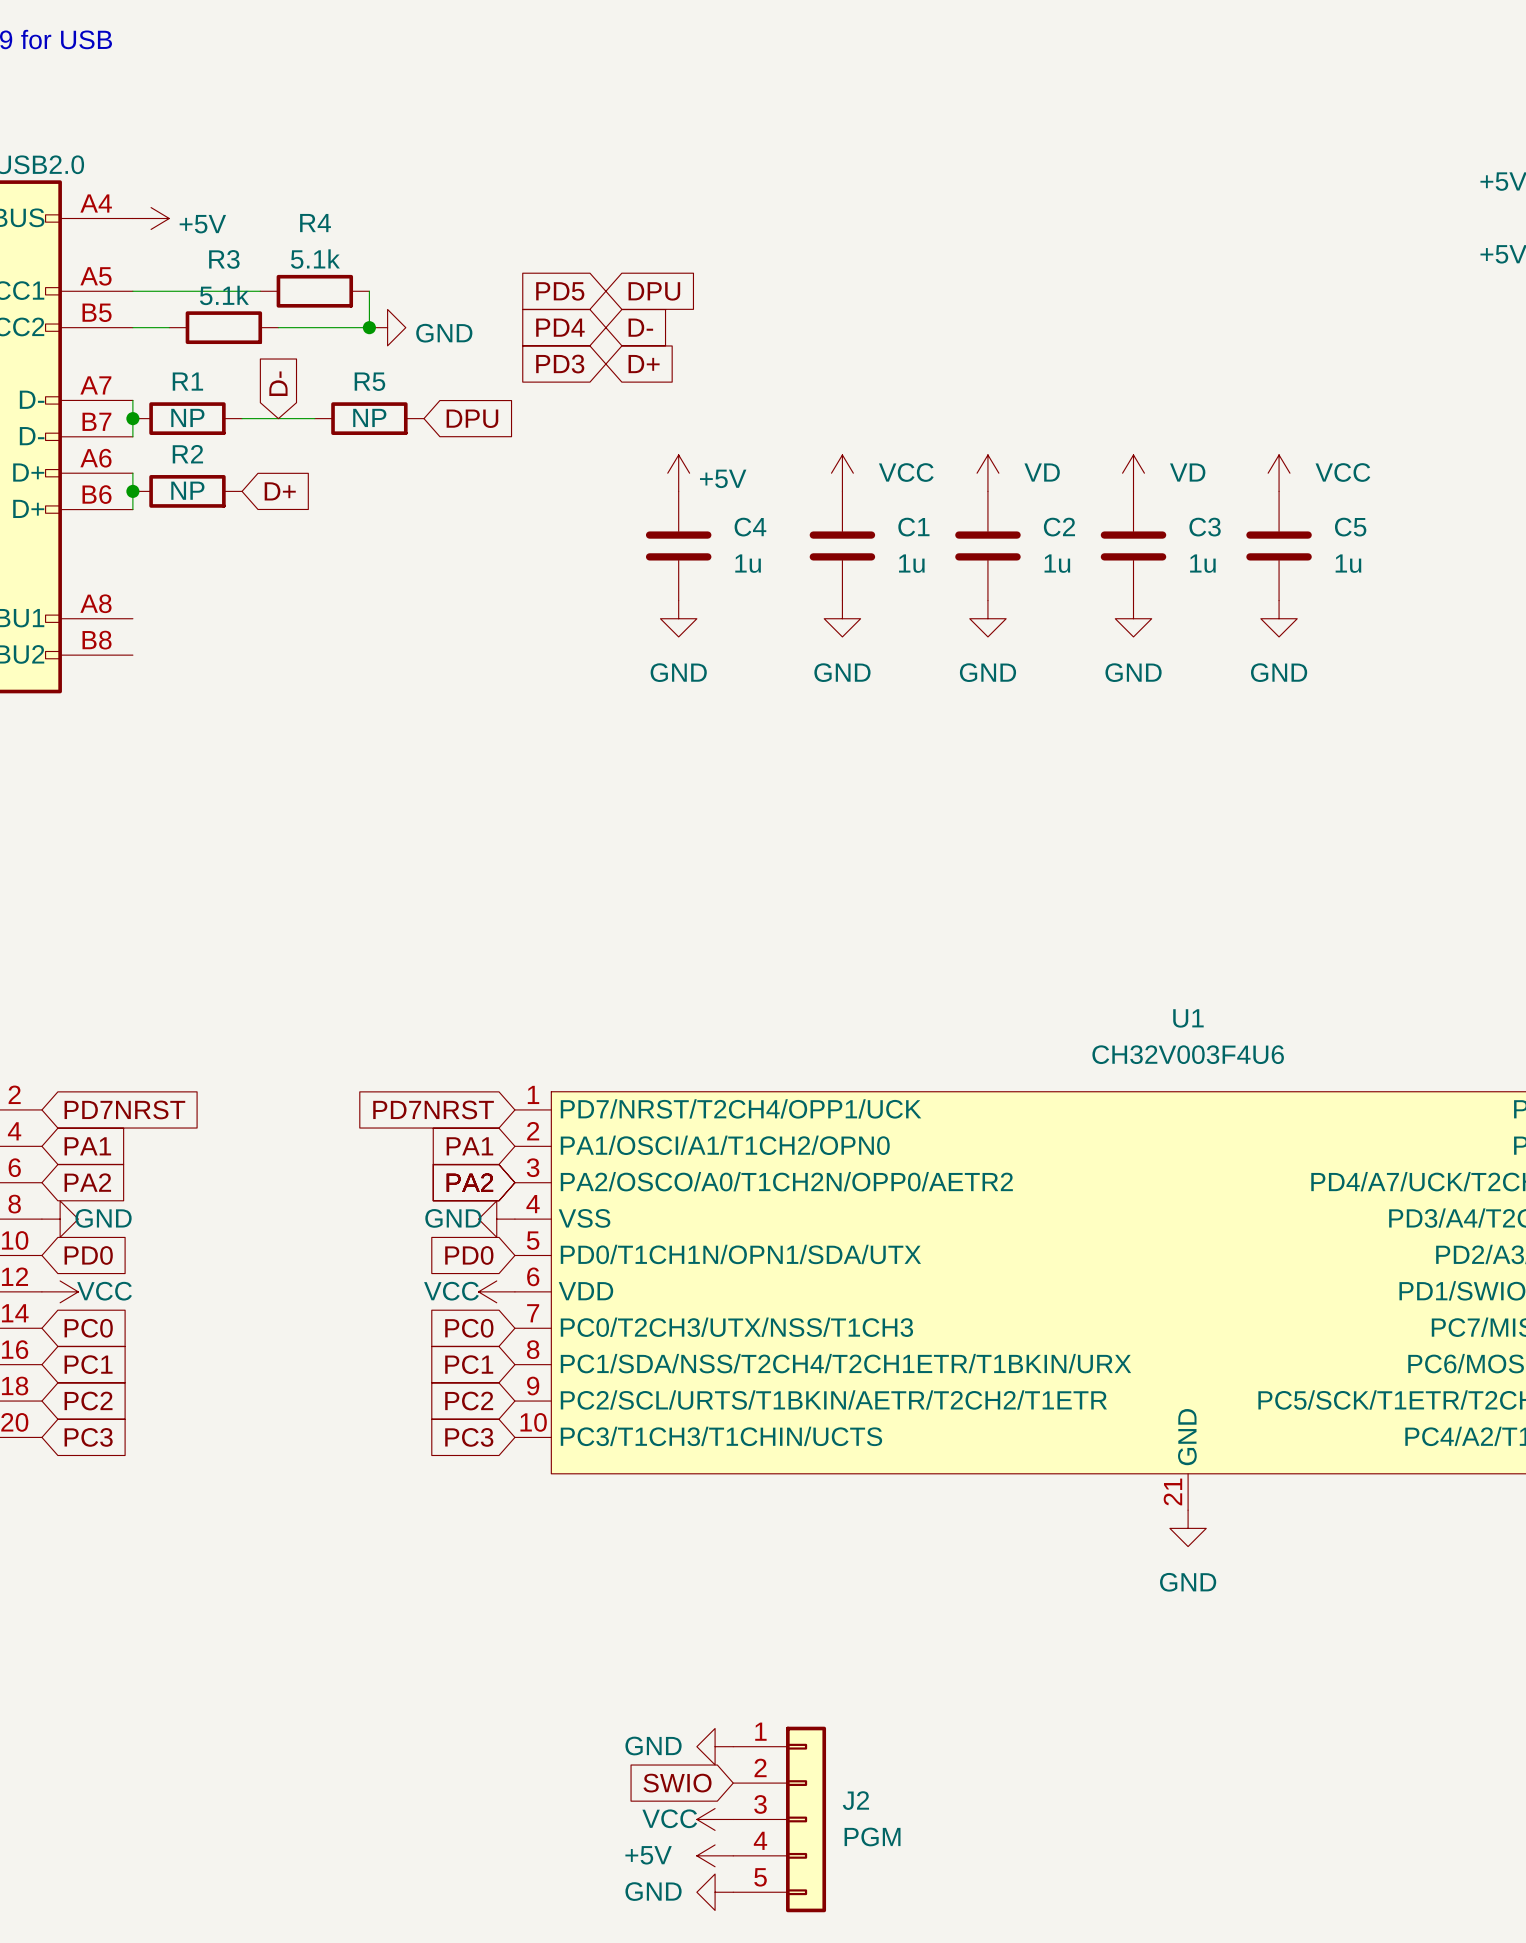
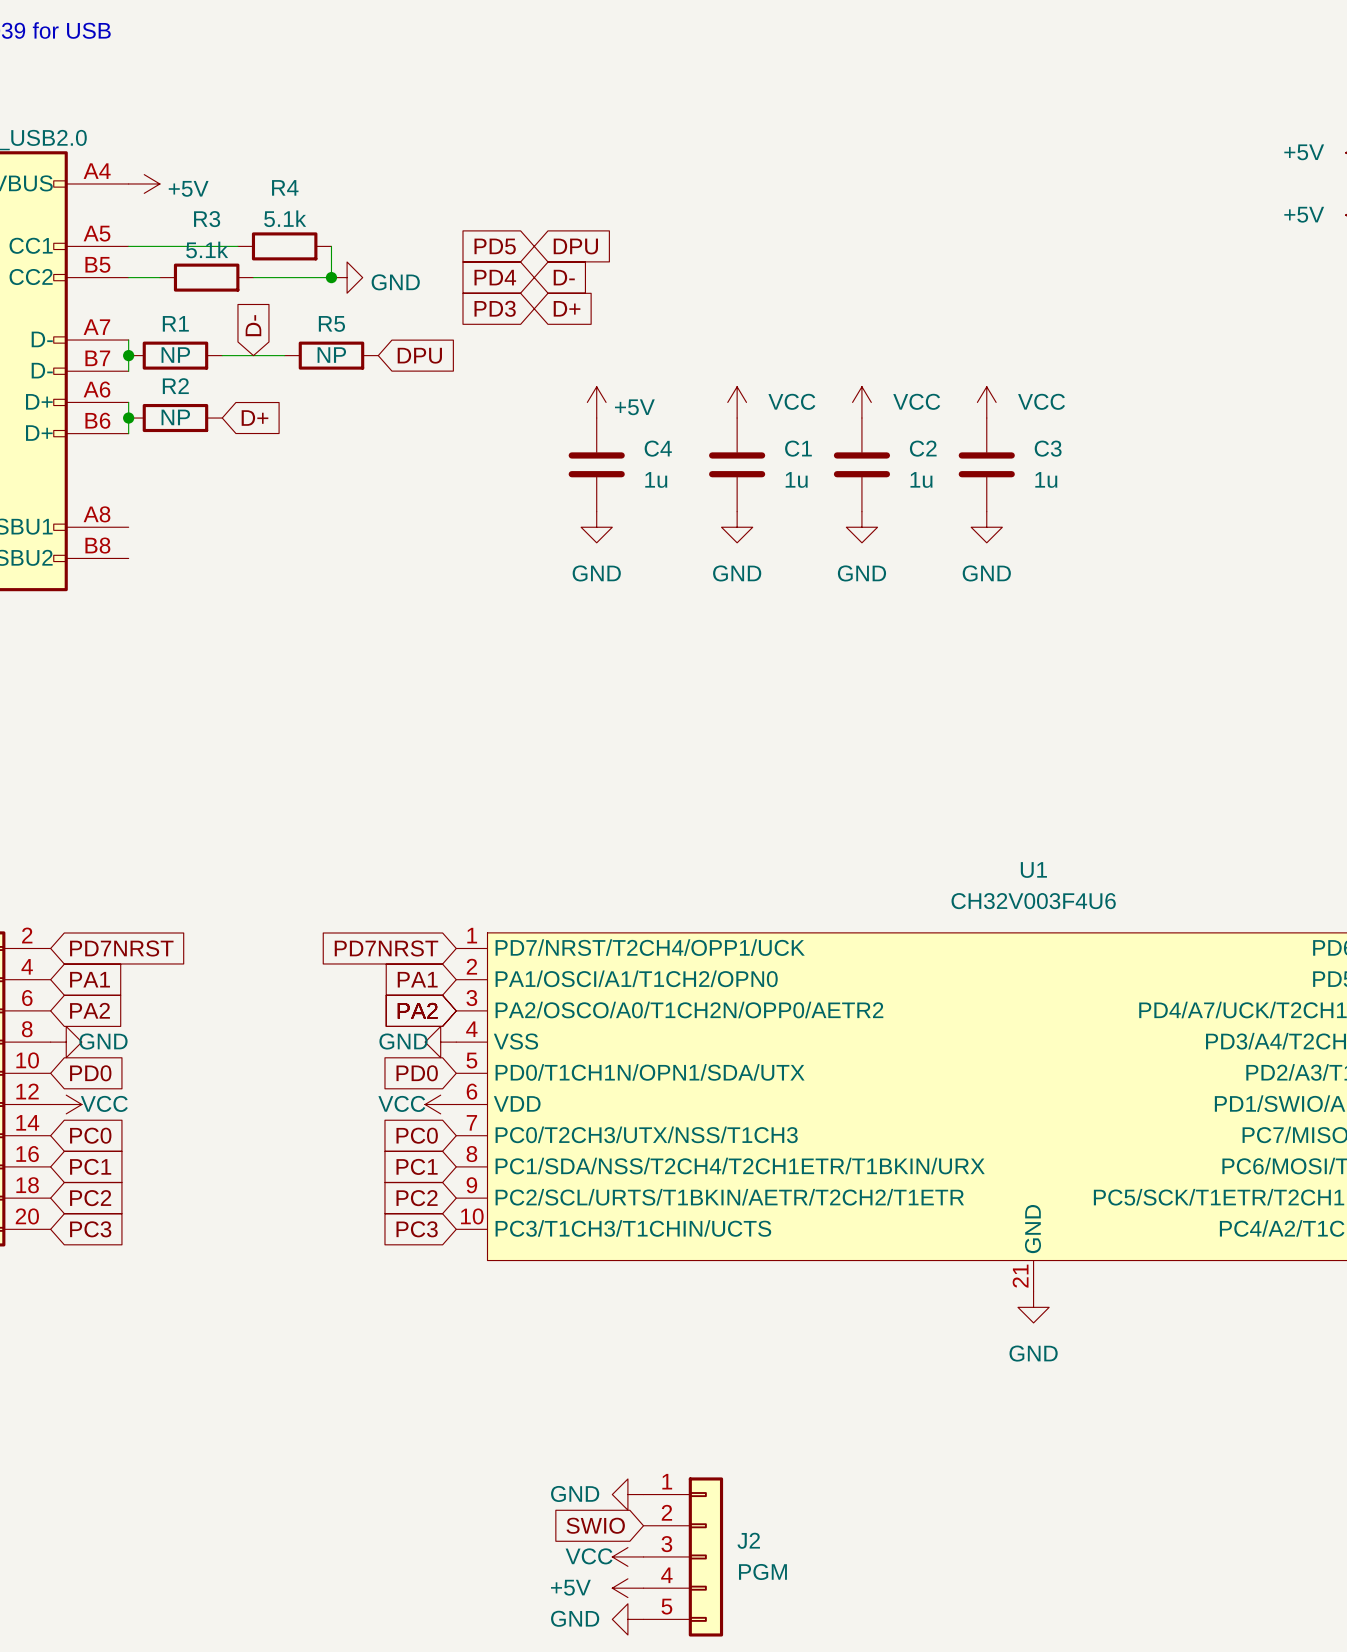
power symbol: VD (987, 473) -> VCC (861, 402)
power symbol: VD (1133, 473) -> VCC (986, 402)
power symbol: VCC (1279, 473) -> none
C5: 1u (1279, 545) -> none
power symbol: GND (1279, 618) -> none

